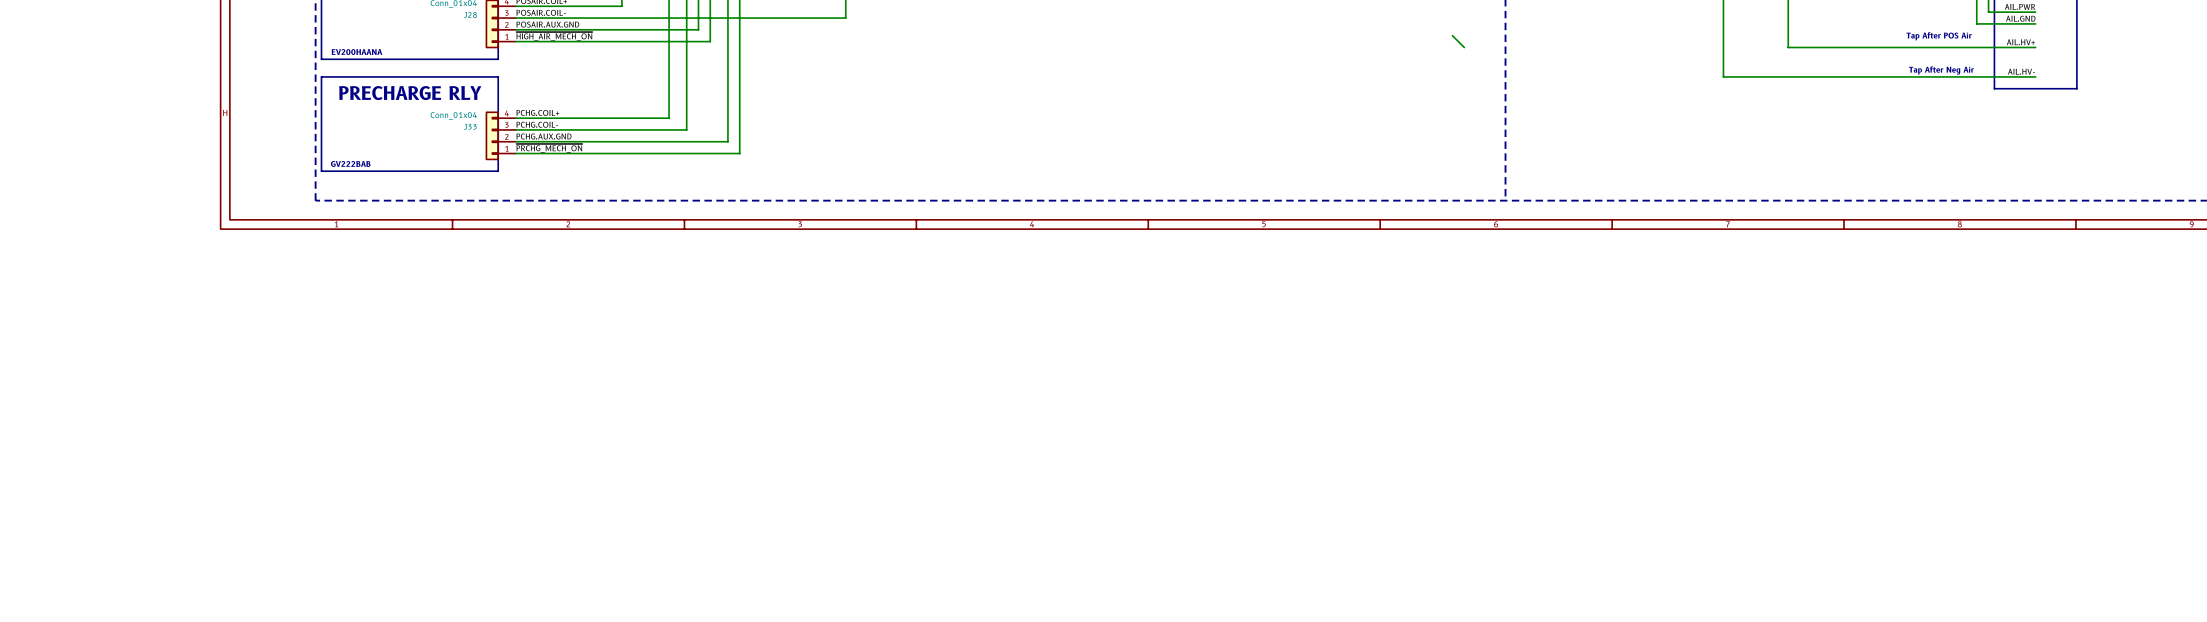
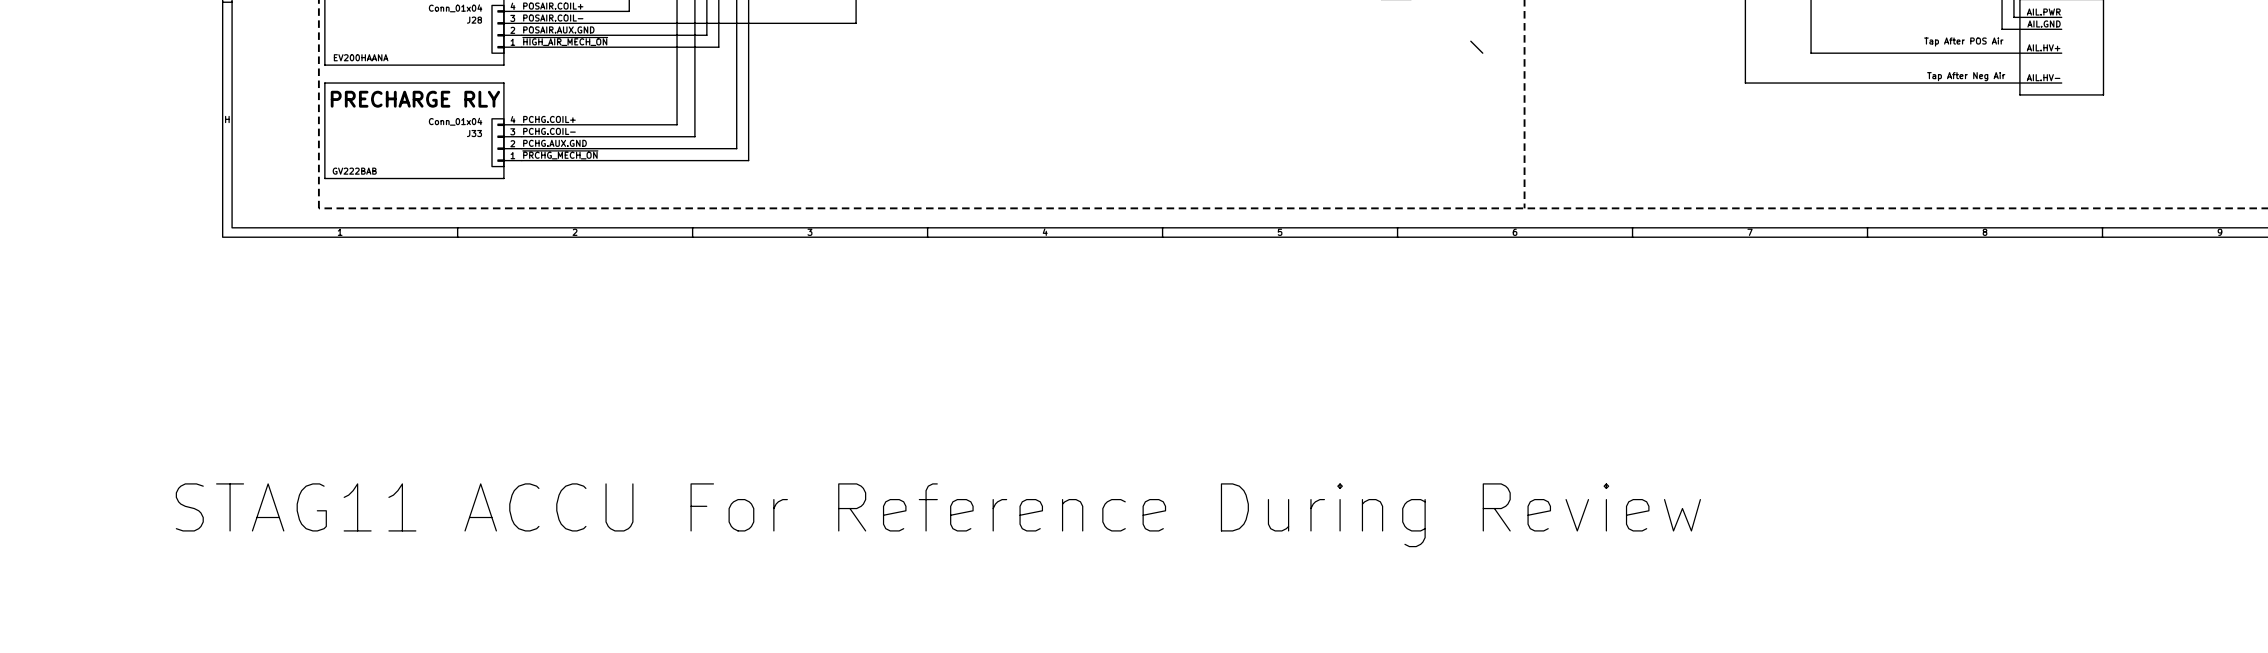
text: none -> STAG11 ACCU For Reference During Review (938, 515)

